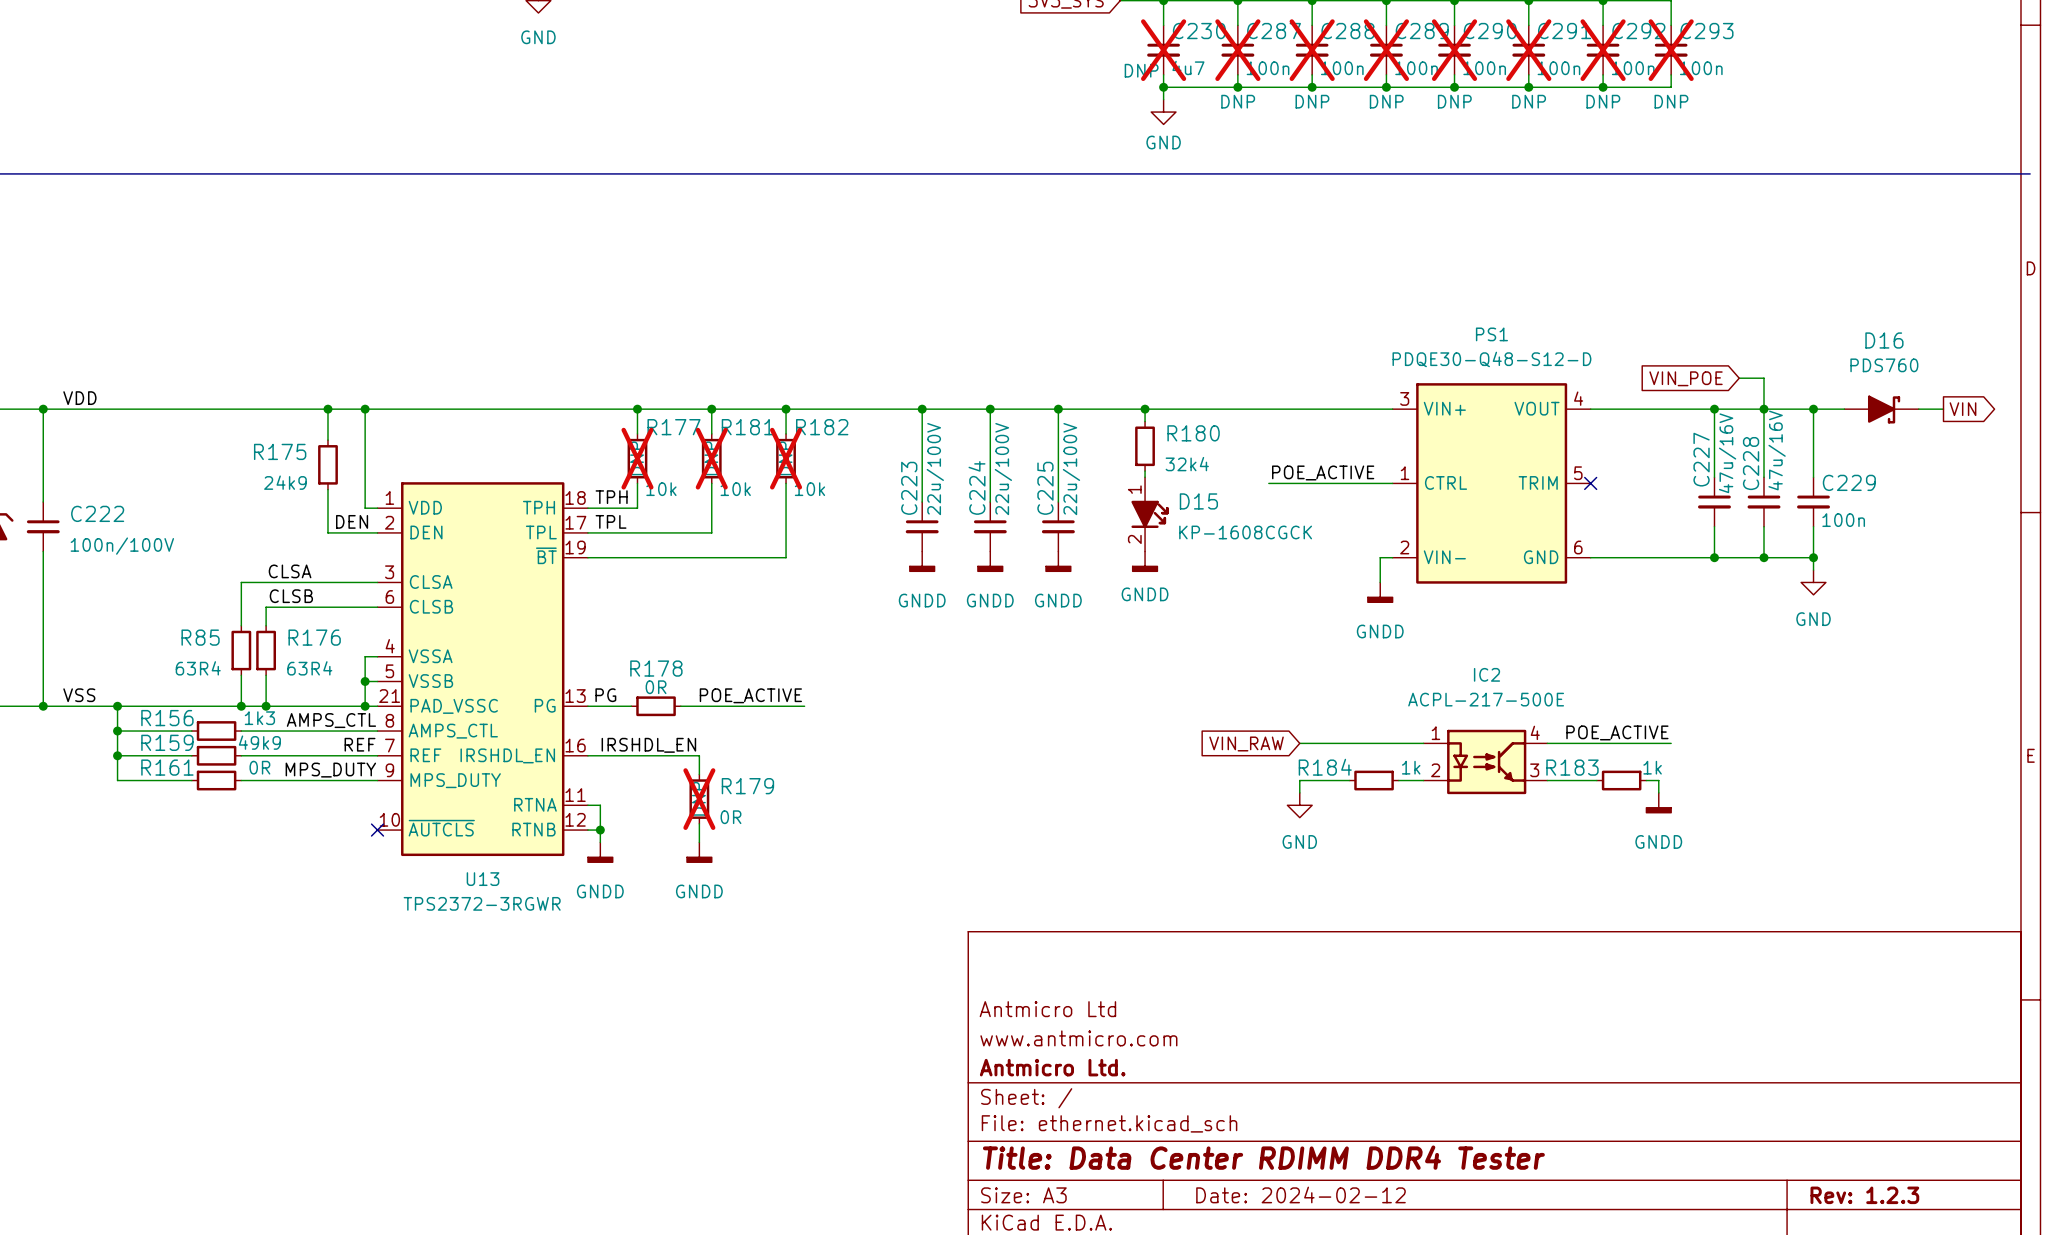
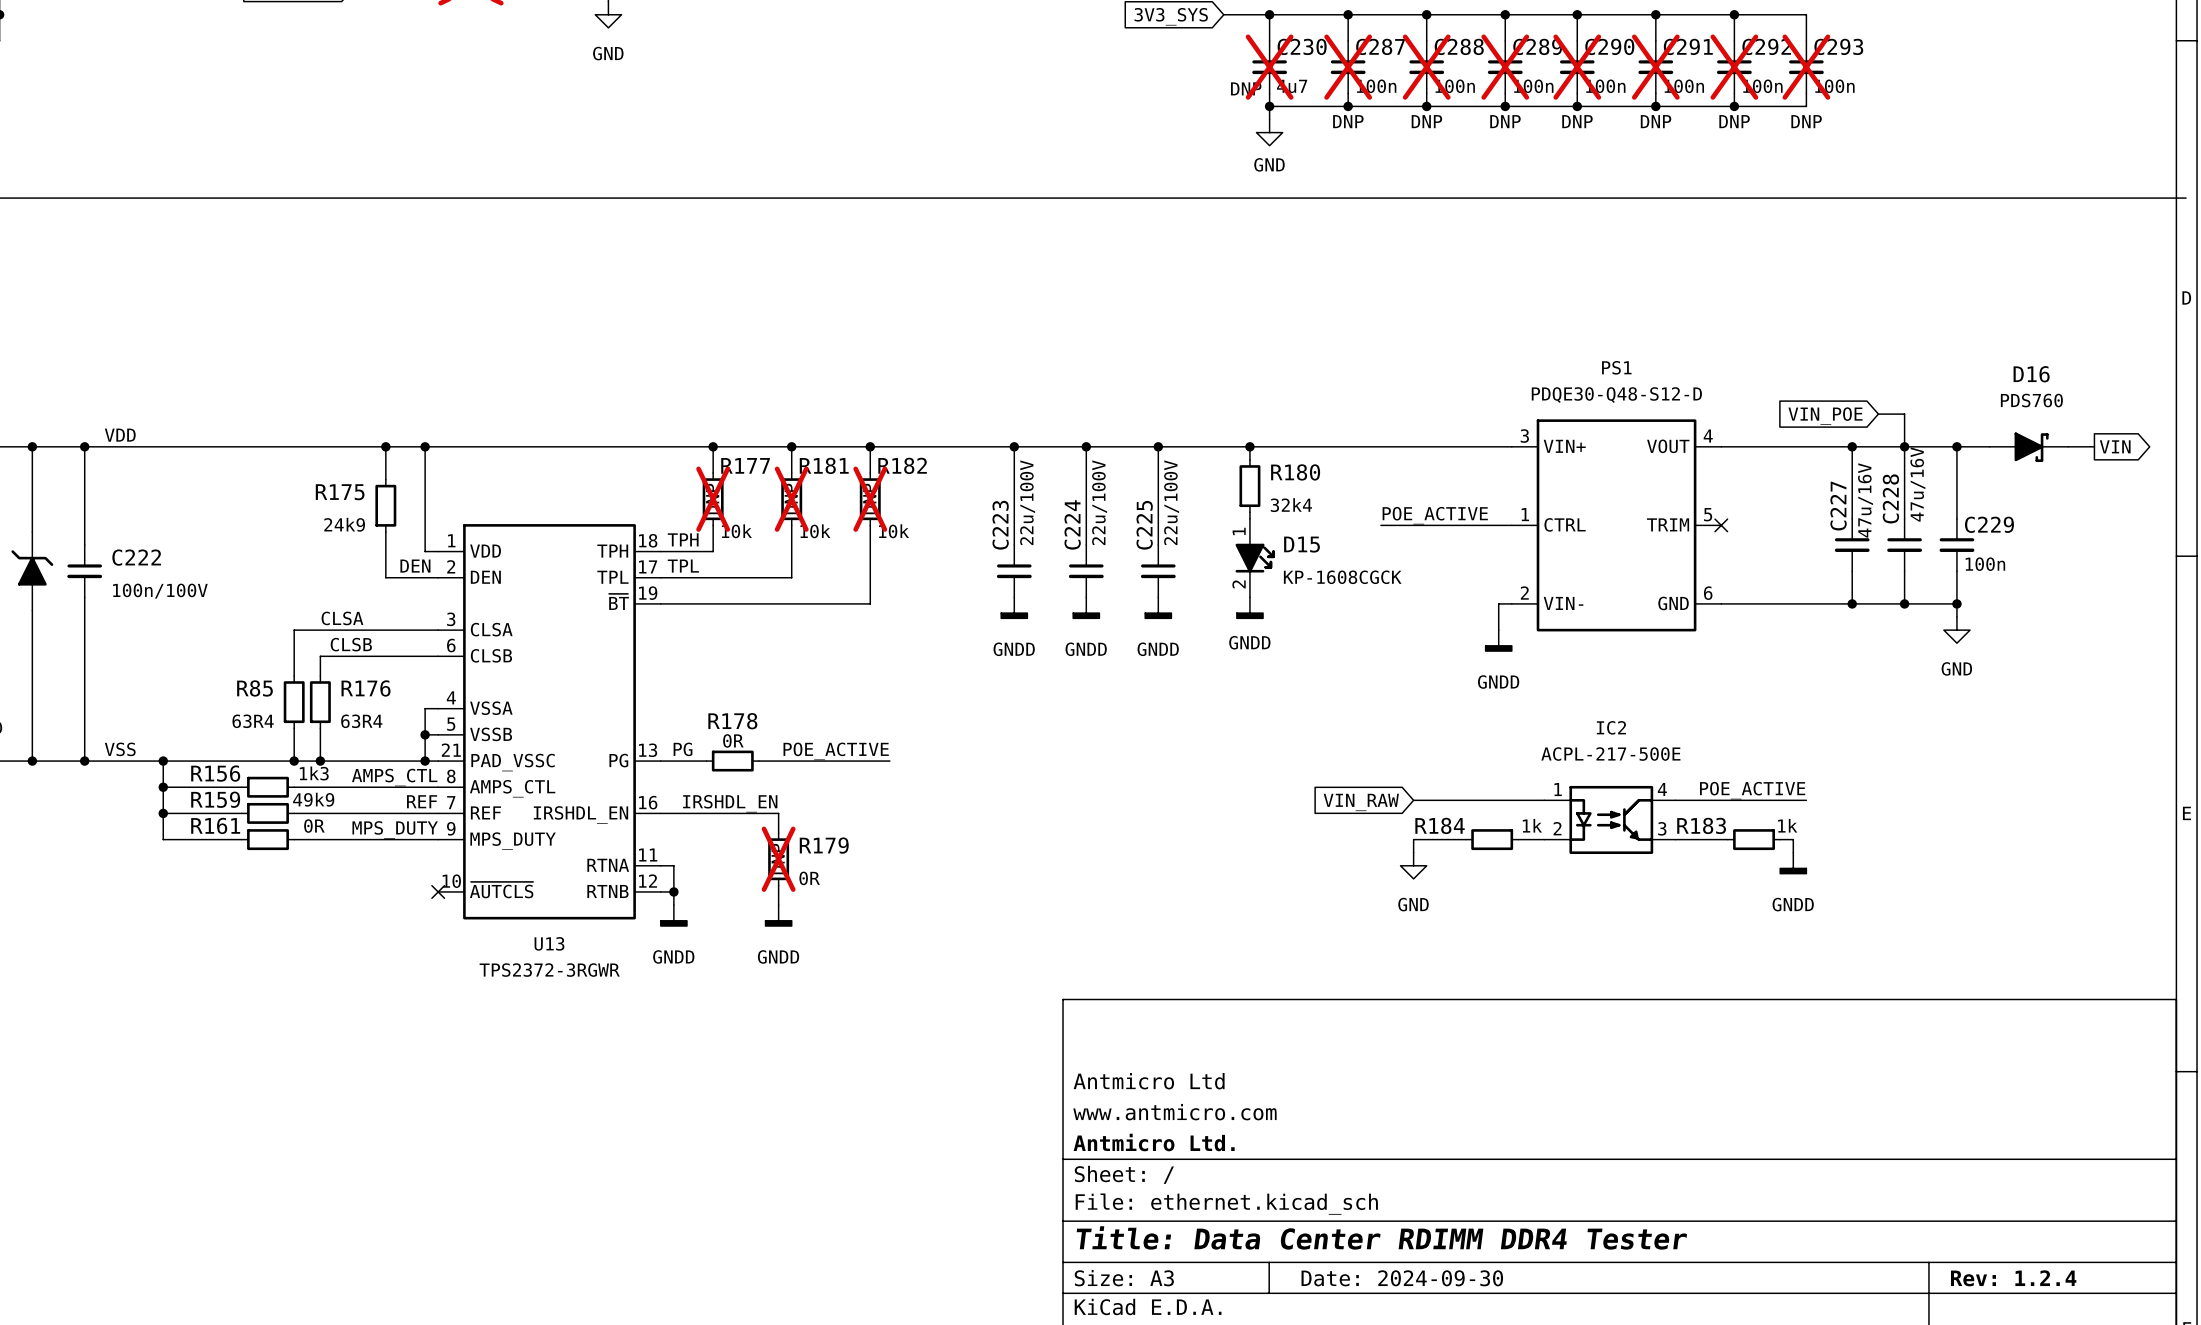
title block: Date: 2024-02-12 (1301, 1194) -> Date: 2024-09-30 (1402, 1278)
title block: Rev: 1.2.3 (1864, 1195) -> Rev: 1.2.4 (2013, 1278)

